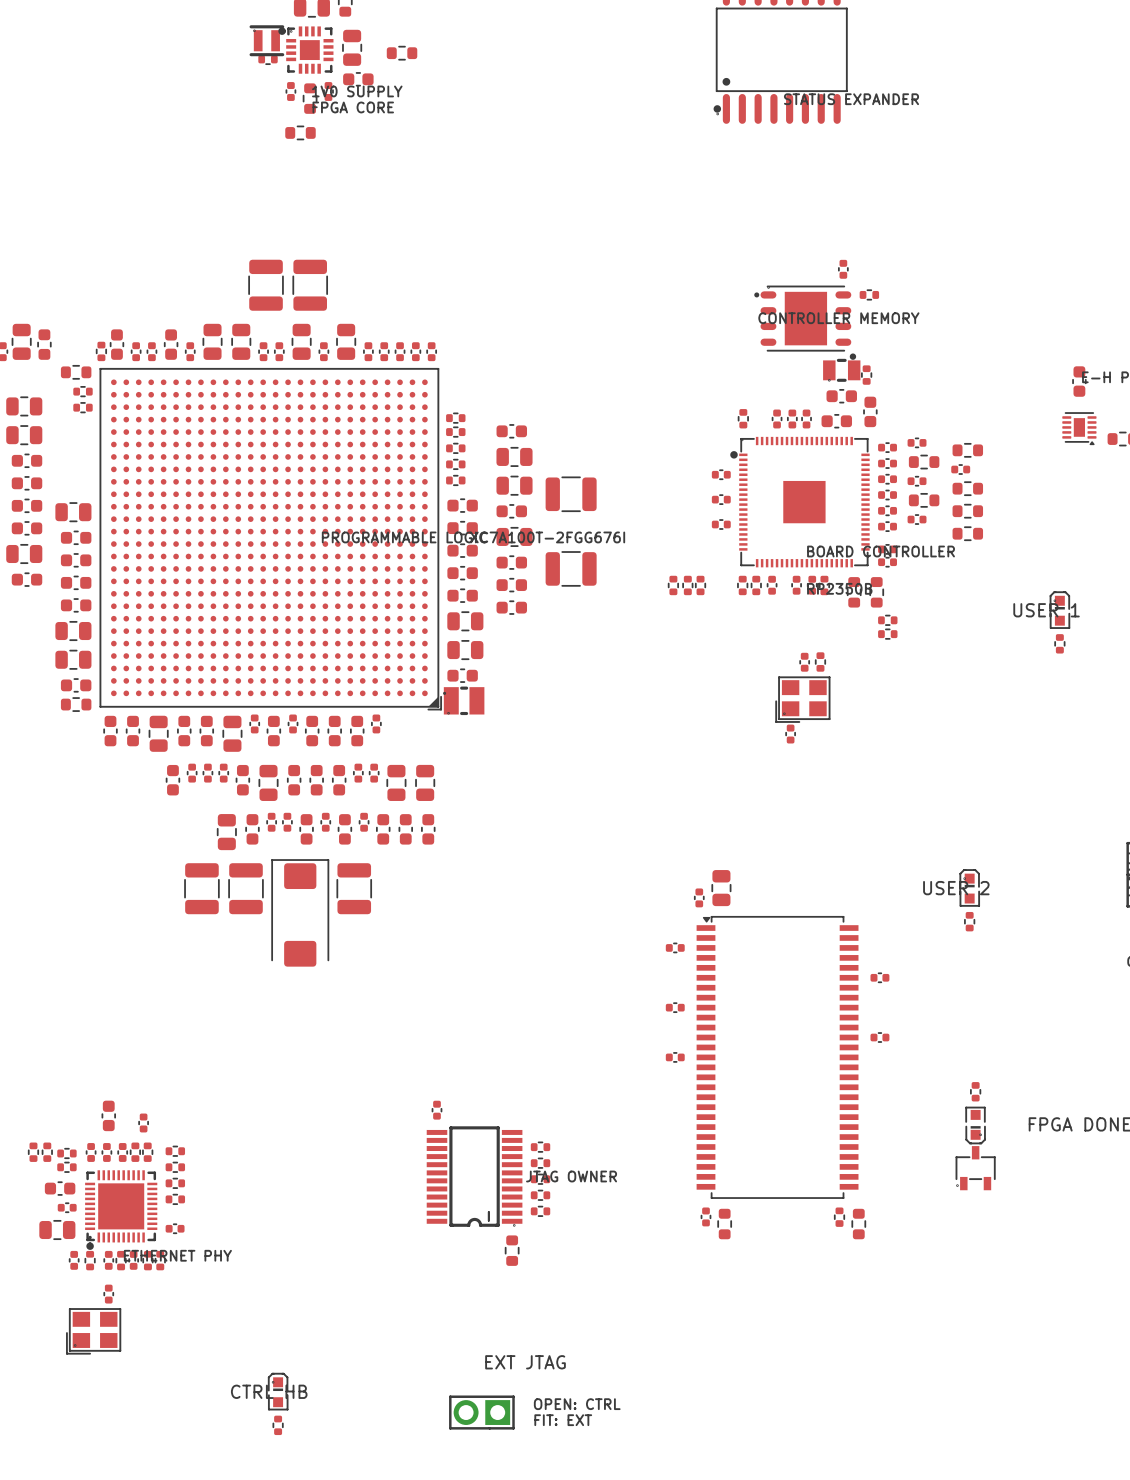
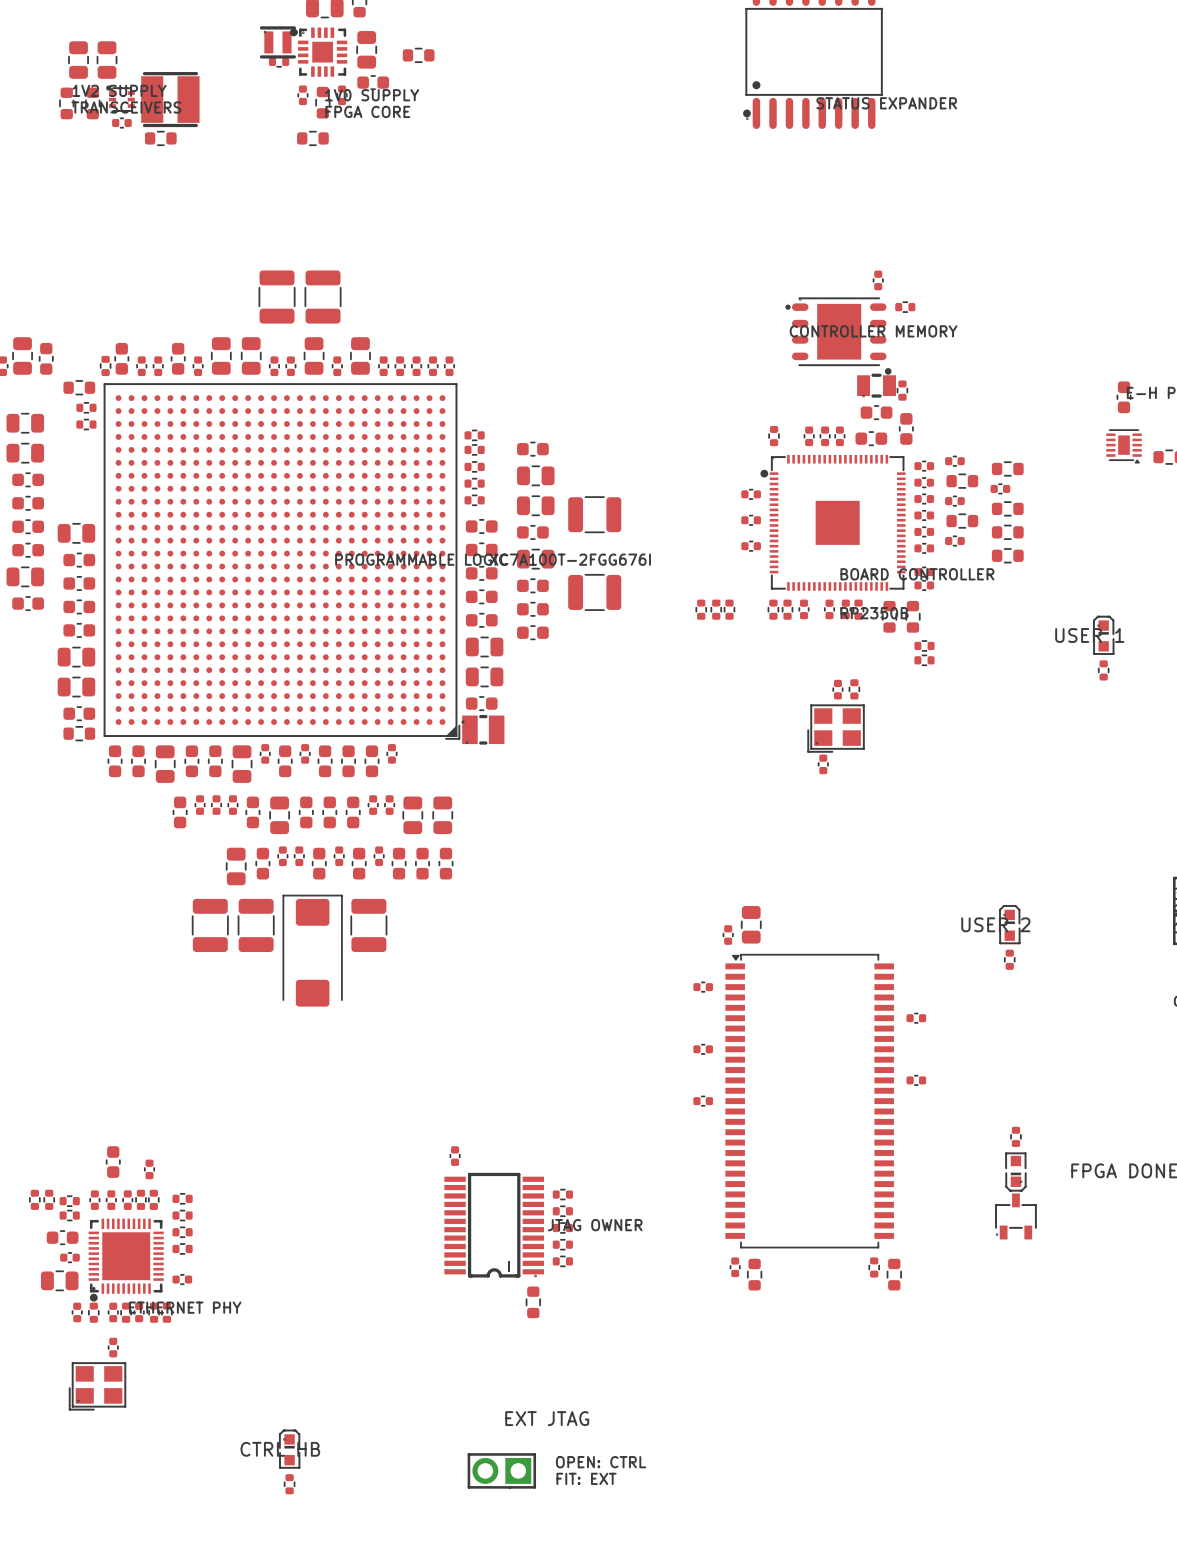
part: none -> (78, 60)
part: none -> (107, 60)
part: none -> (120, 98)
part: none -> (170, 99)
part: none -> (66, 103)
part: none -> (92, 103)
part: none -> (121, 123)
part: none -> (160, 138)

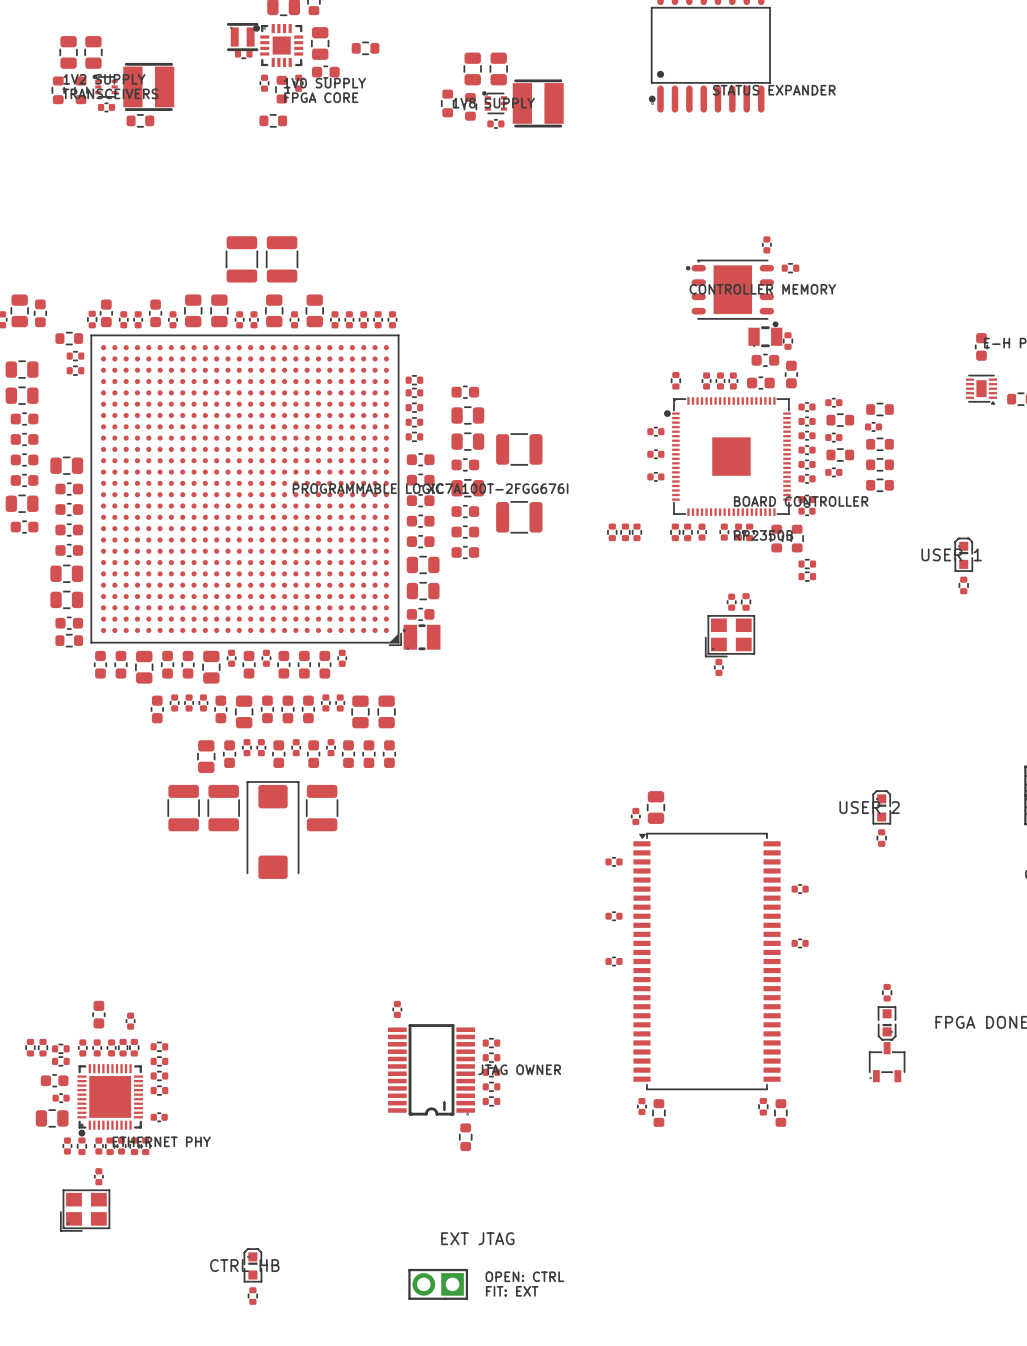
part: none -> (472, 68)
part: none -> (498, 68)
part: none -> (494, 102)
part: none -> (447, 103)
part: none -> (538, 103)
part: none -> (470, 106)
part: none -> (495, 123)

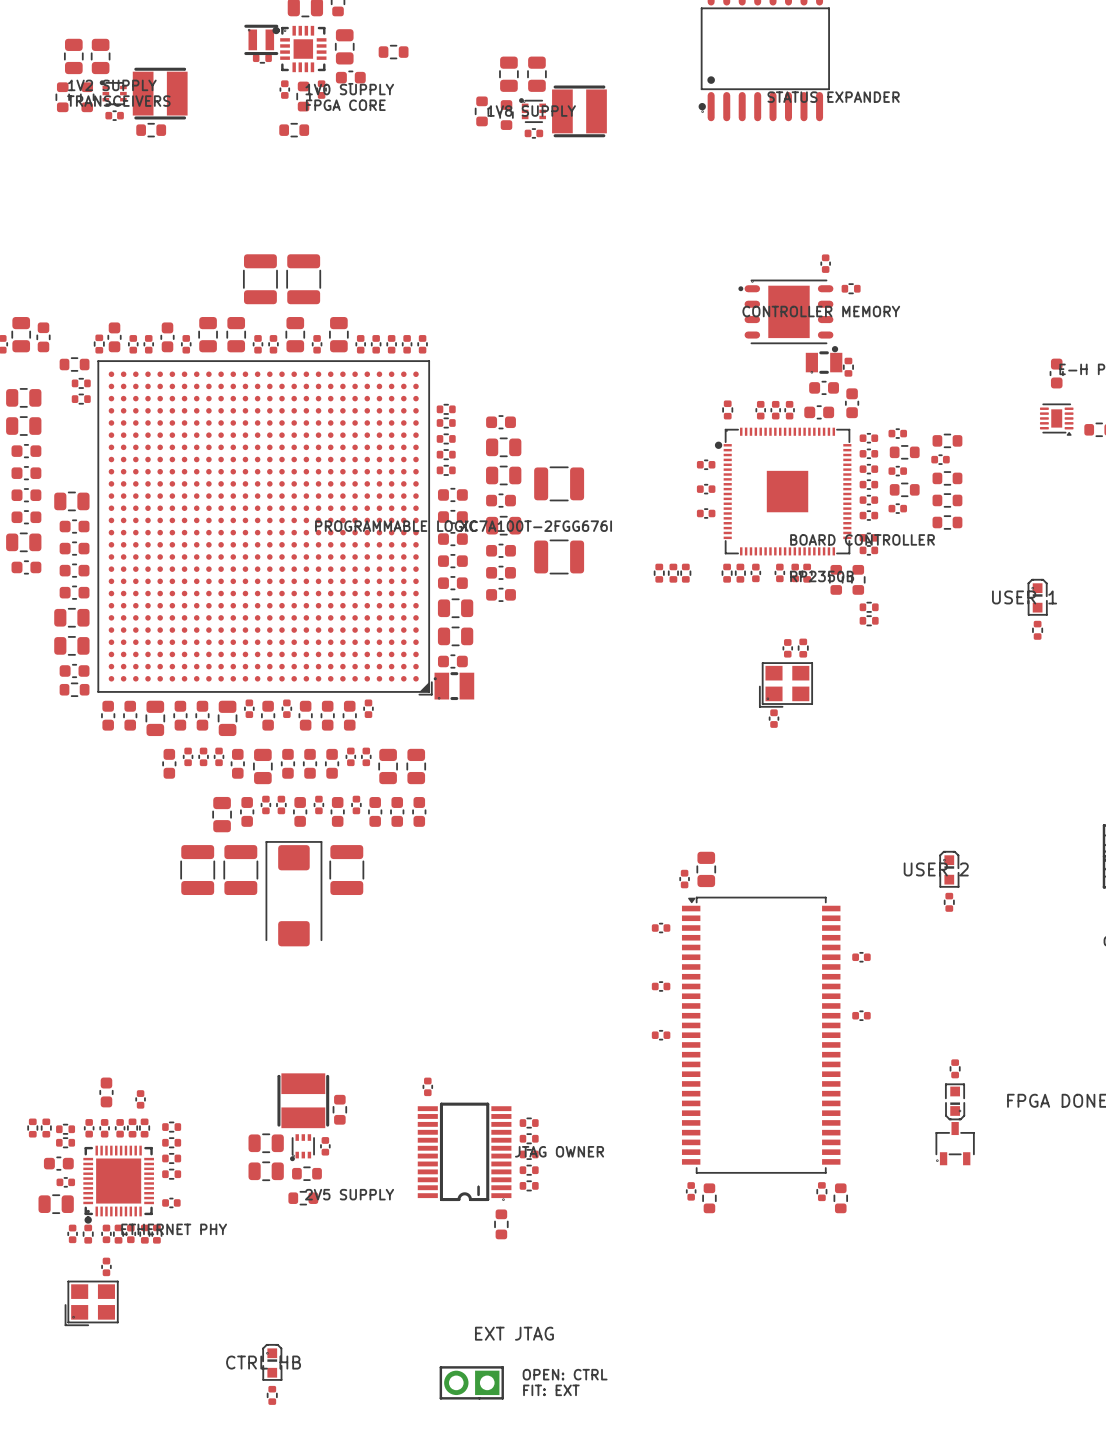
part: none -> (303, 1100)
part: none -> (339, 1109)
part: none -> (266, 1143)
part: none -> (325, 1146)
part: none -> (302, 1147)
part: none -> (266, 1171)
part: none -> (306, 1173)
part: none -> (303, 1198)

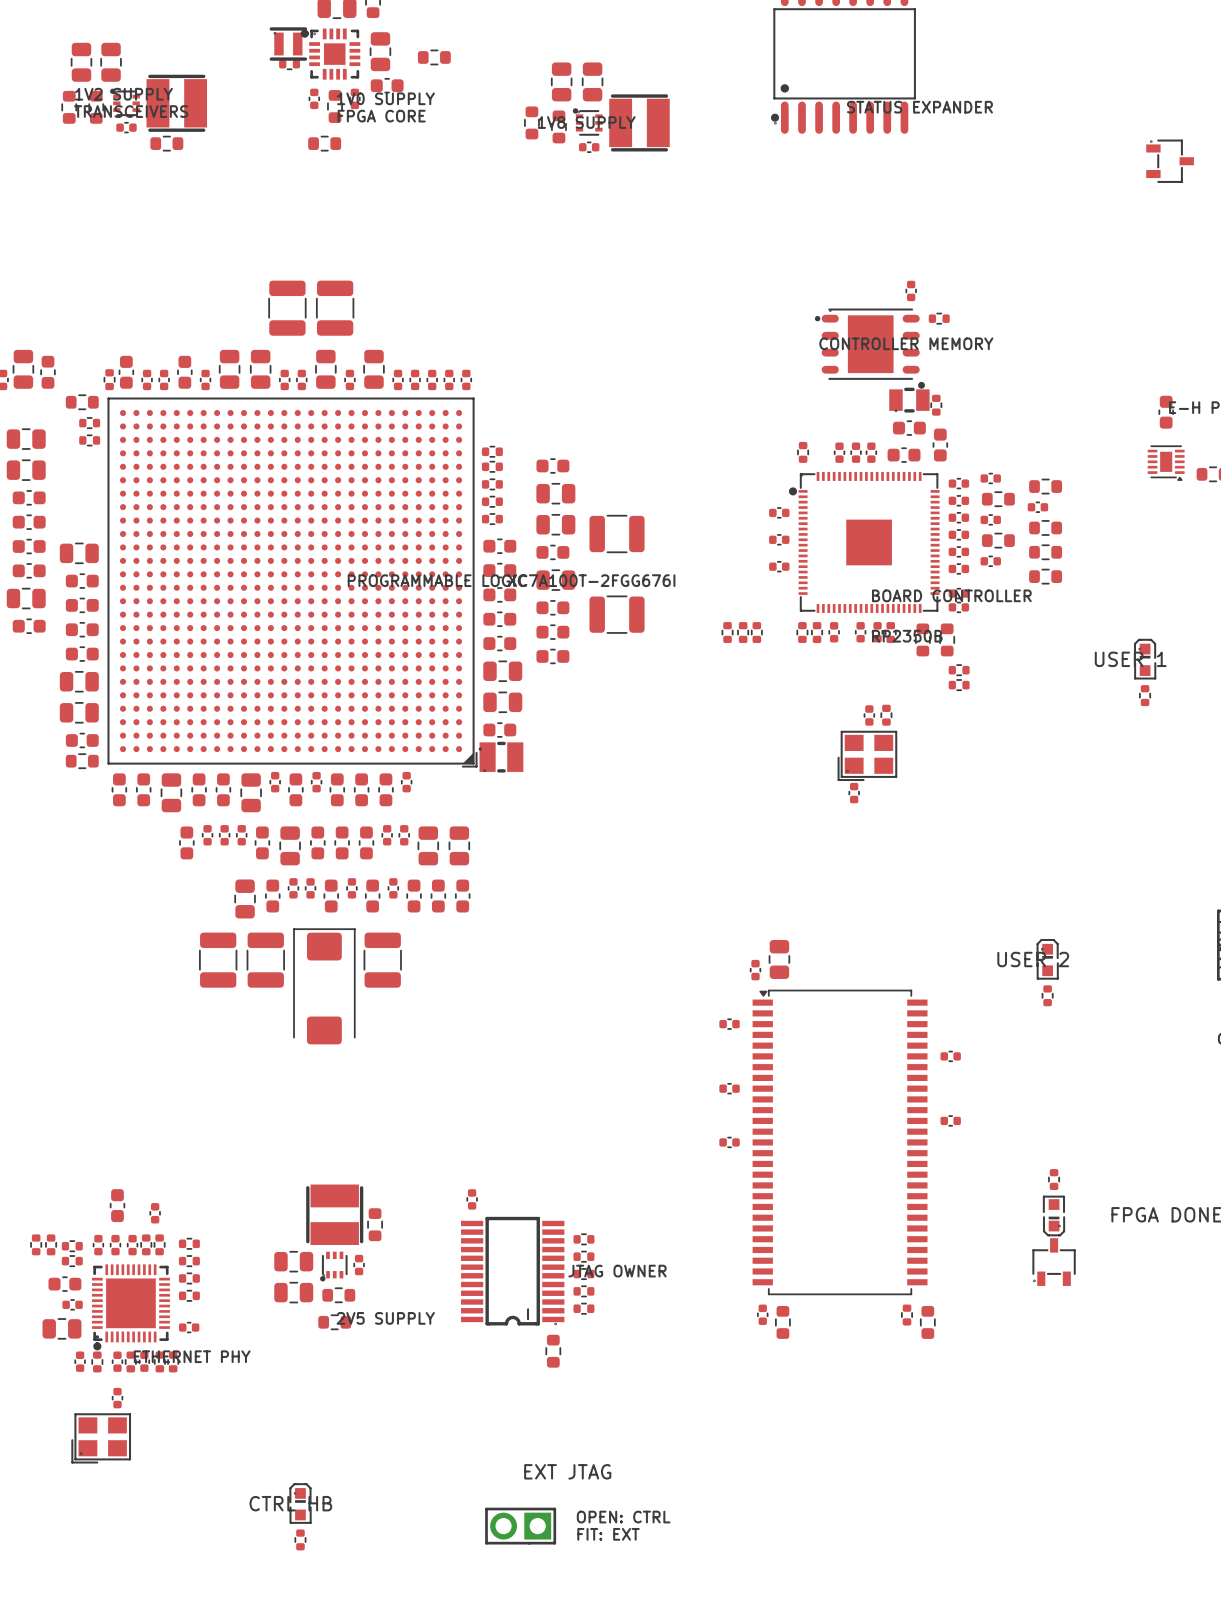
part: none -> (1170, 161)

